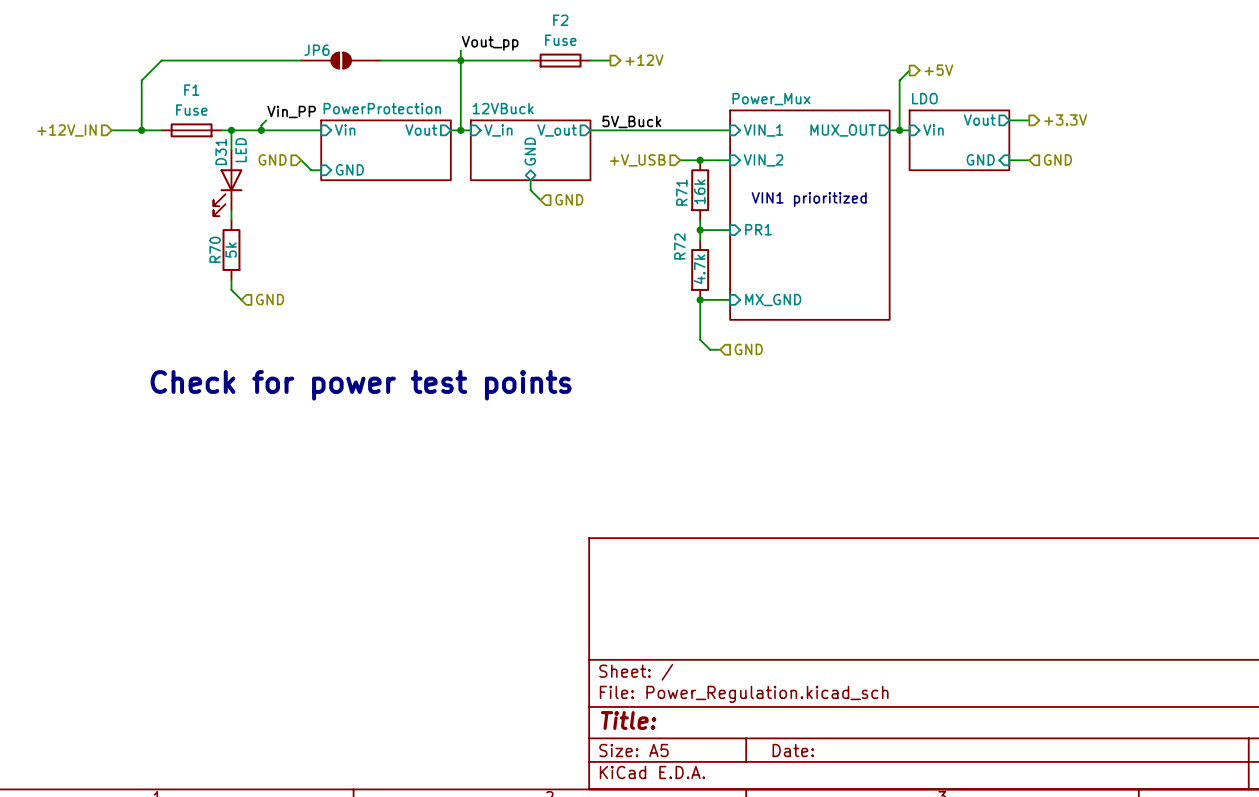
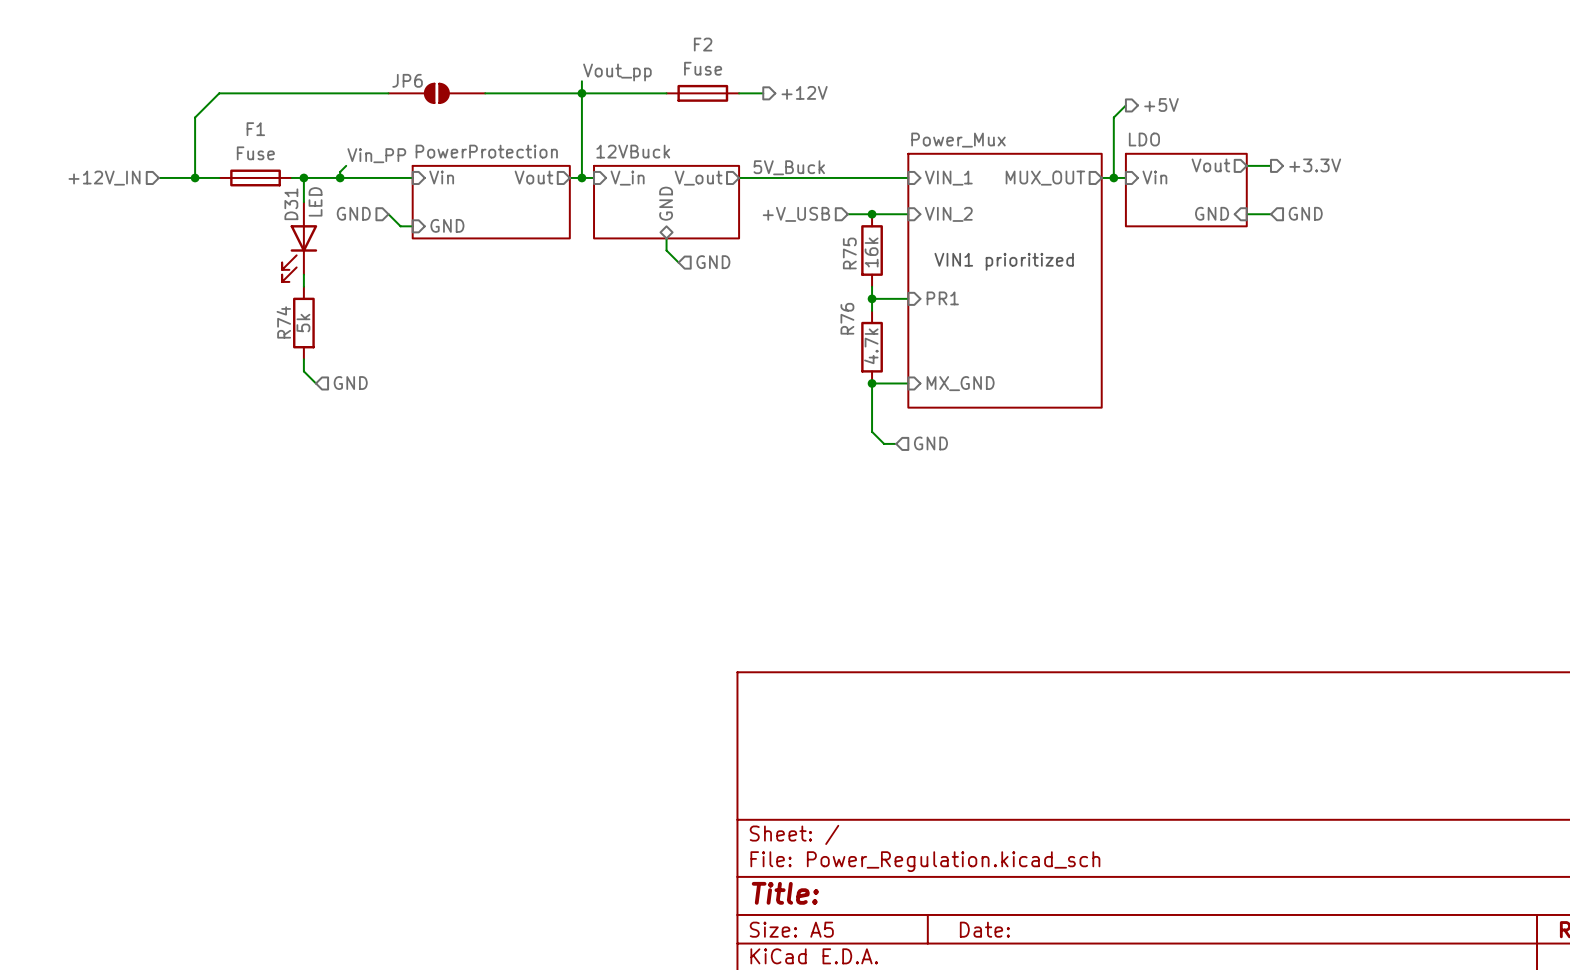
R71 name: R71 (681, 192) -> R75 (849, 253)
R72 name: R72 (679, 246) -> R76 (847, 318)
R70 name: R70 (215, 249) -> R74 (283, 322)
text: Check for power test points (361, 385) -> none

